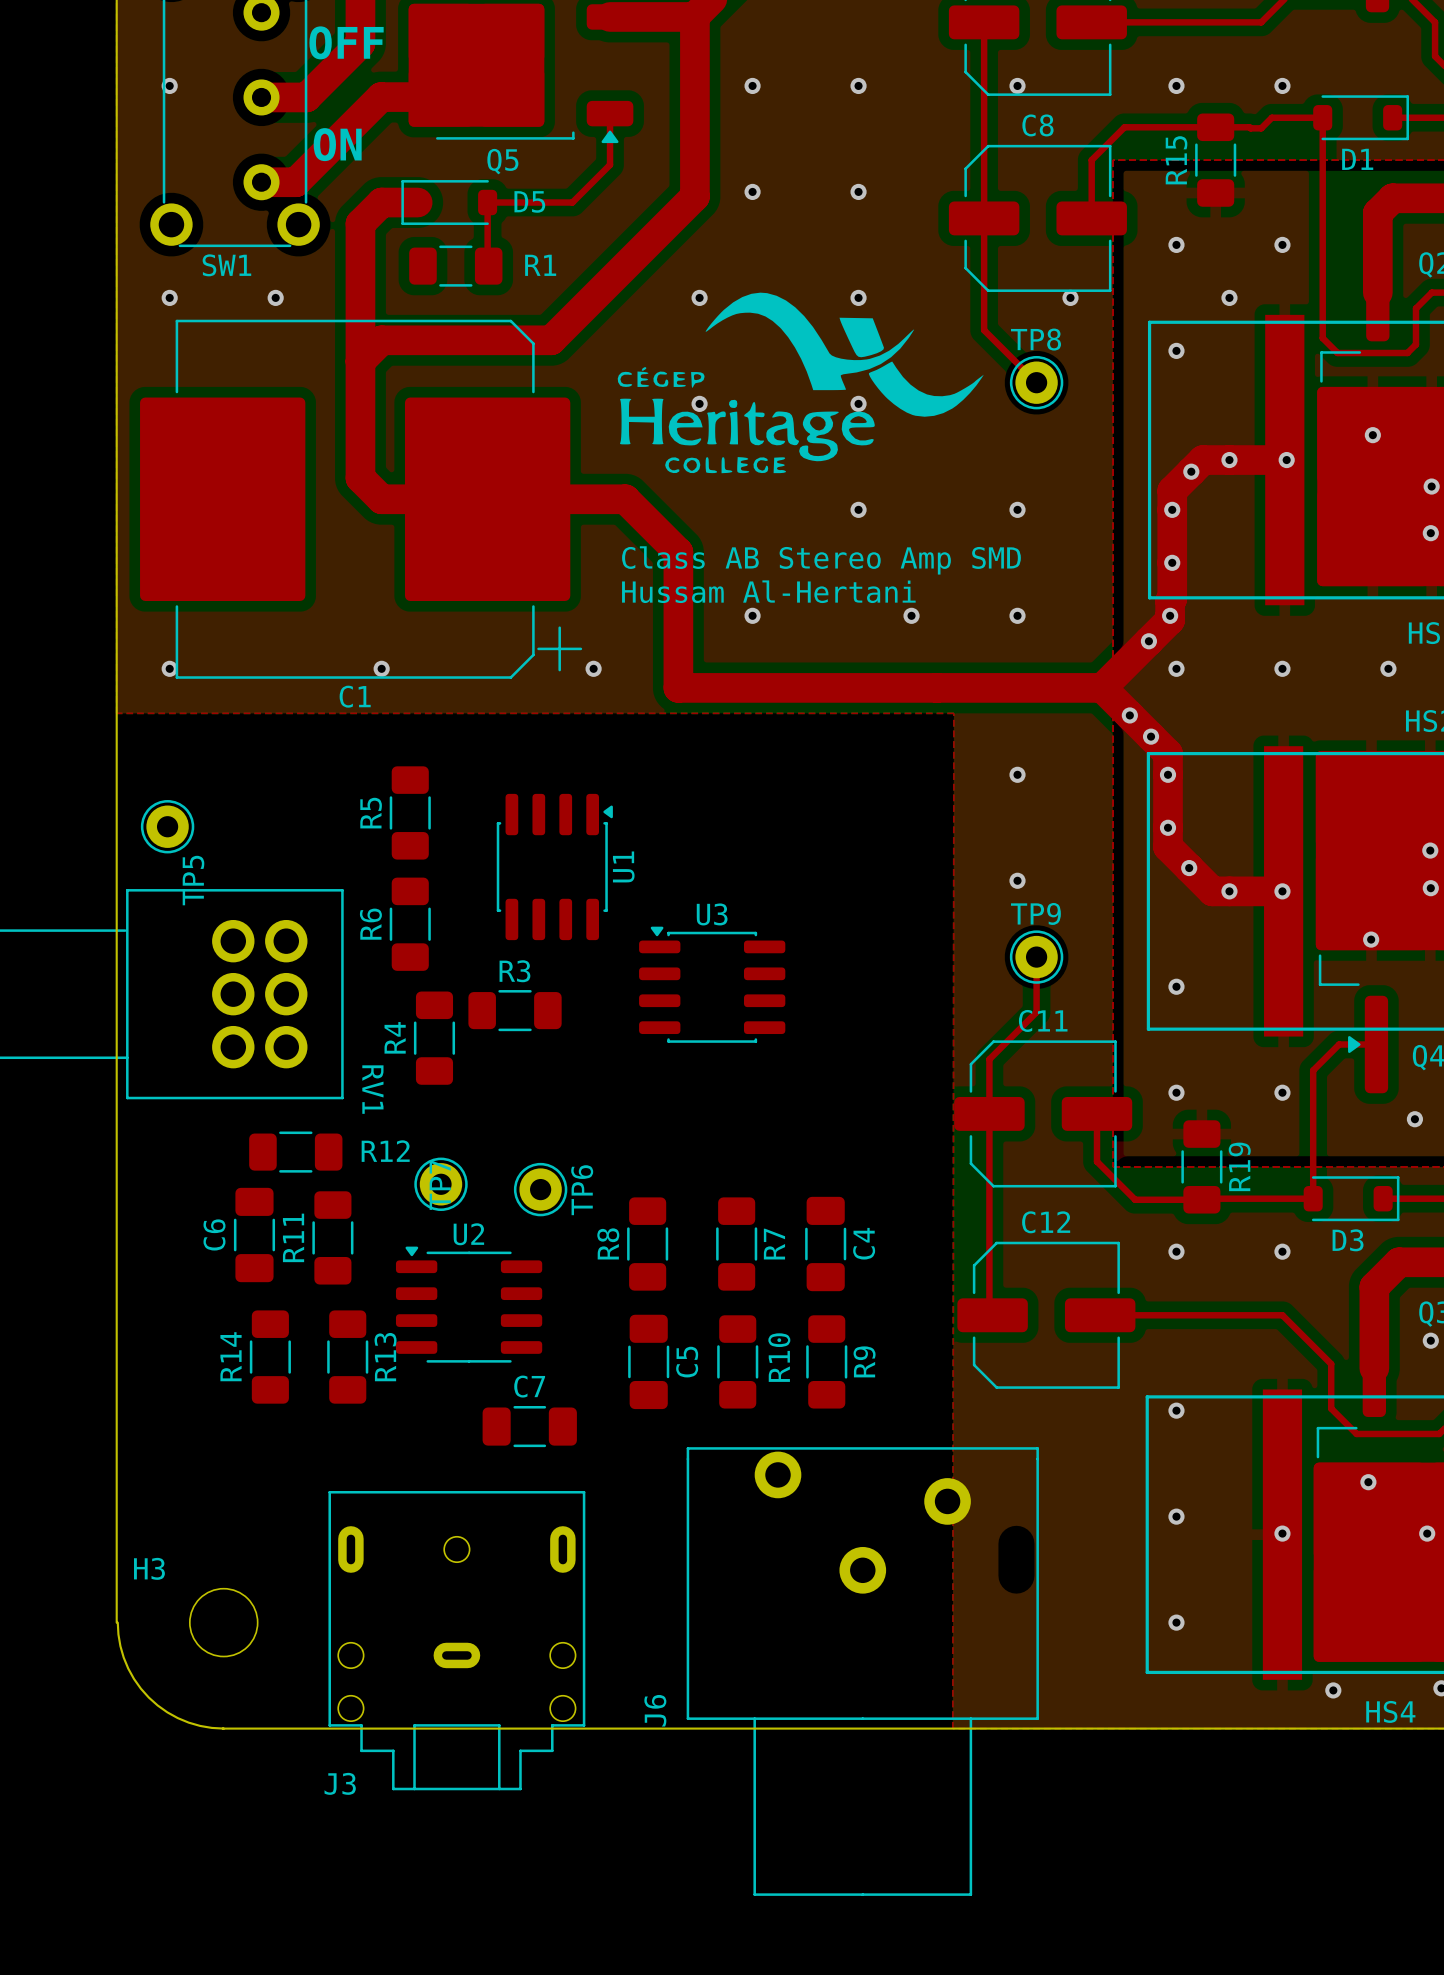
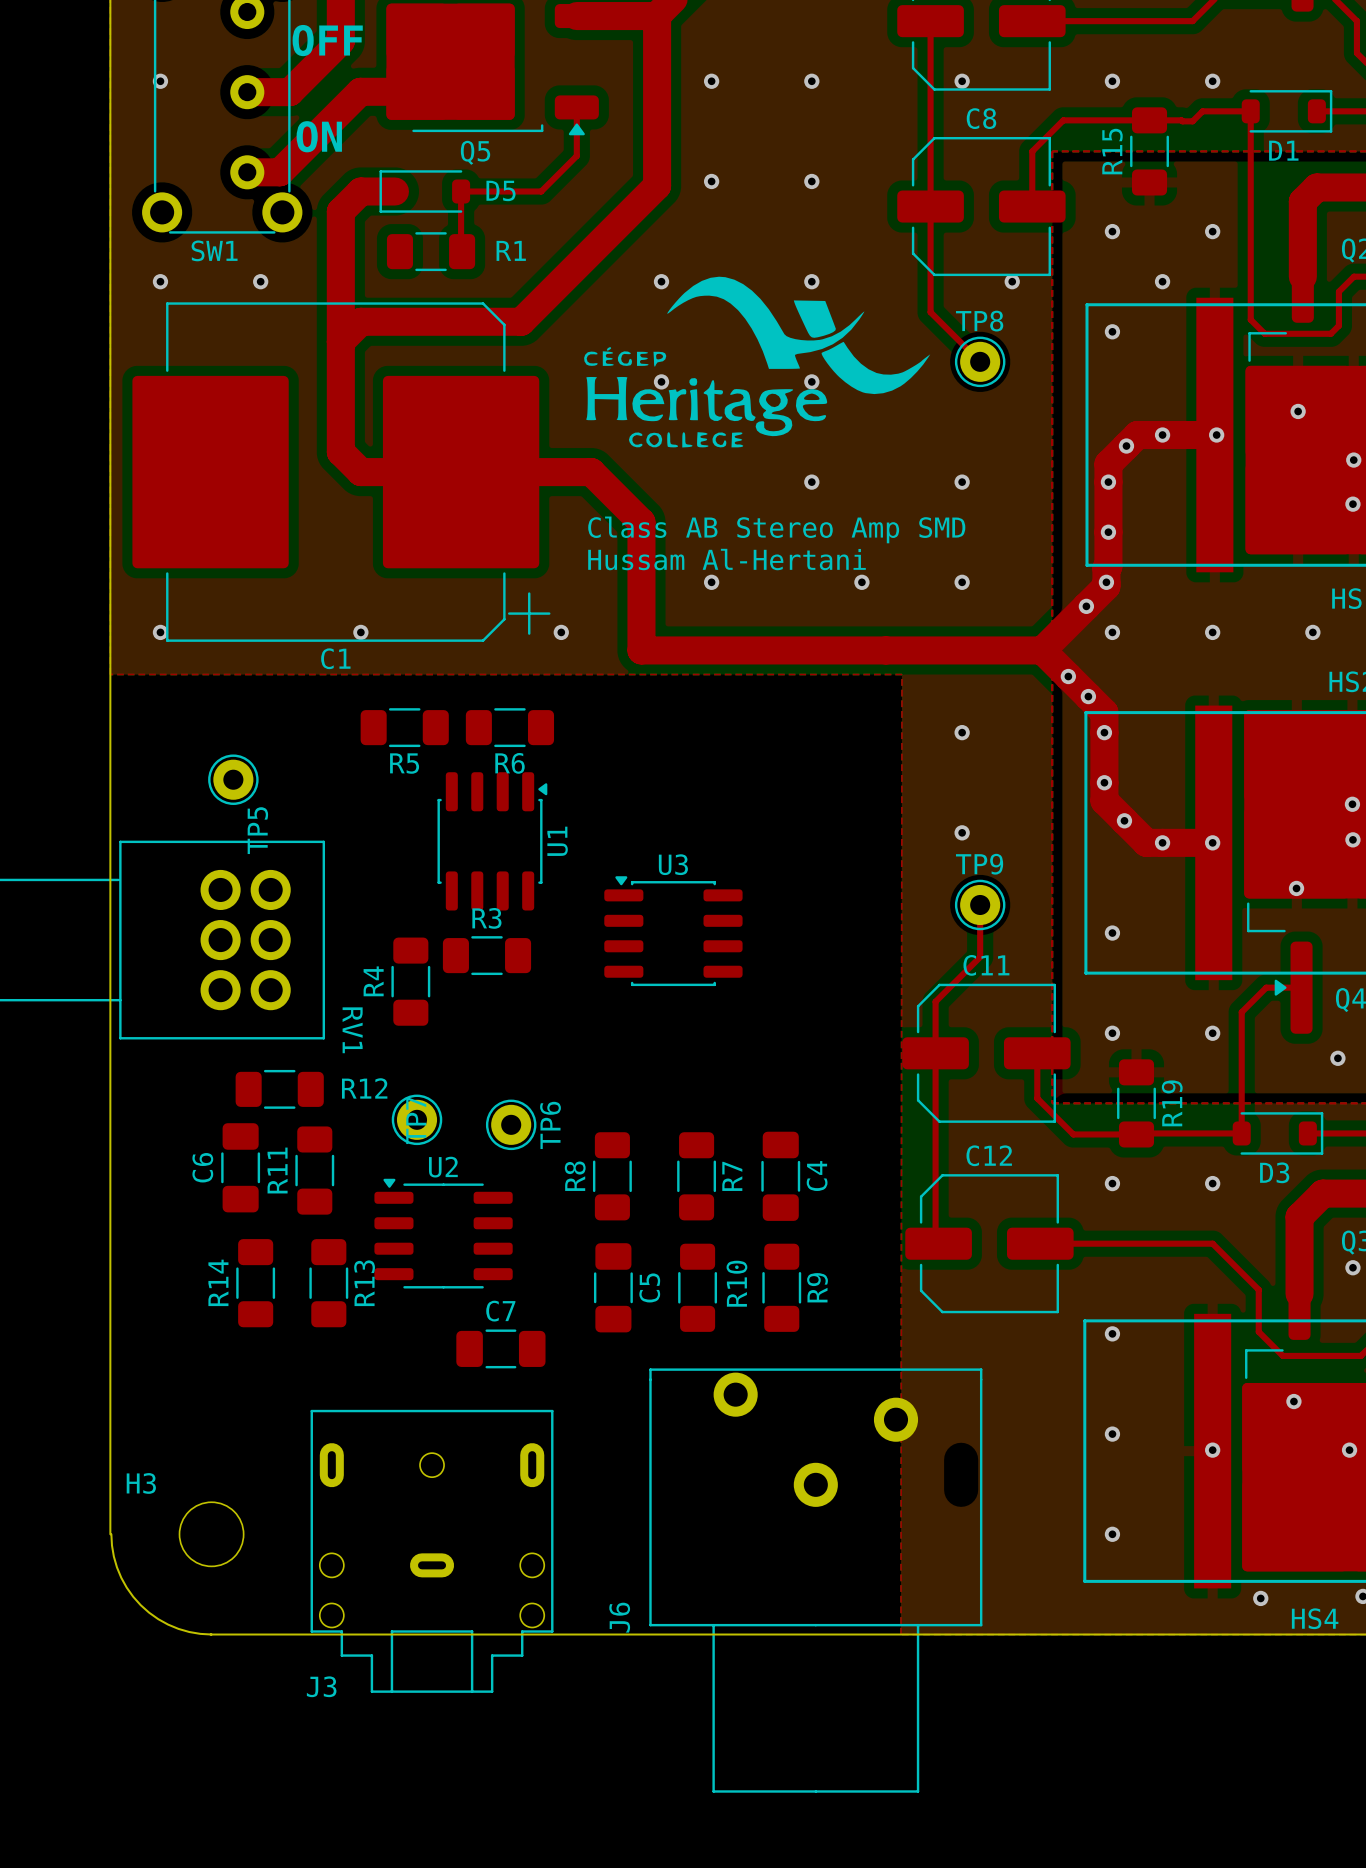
R5 rotation: 0° (410, 812) -> 90° clockwise (404, 727)
R5 name position: R5 (371, 813) -> R5 (404, 763)
TP5 position: (167, 826) -> (233, 779)
U1 position: (554, 867) -> (492, 841)
R6 name position: R6 (370, 924) -> R6 (510, 763)
R6 rotation: 0° (410, 924) -> 90° clockwise (509, 727)
R6 position: (410, 924) -> (509, 727)

